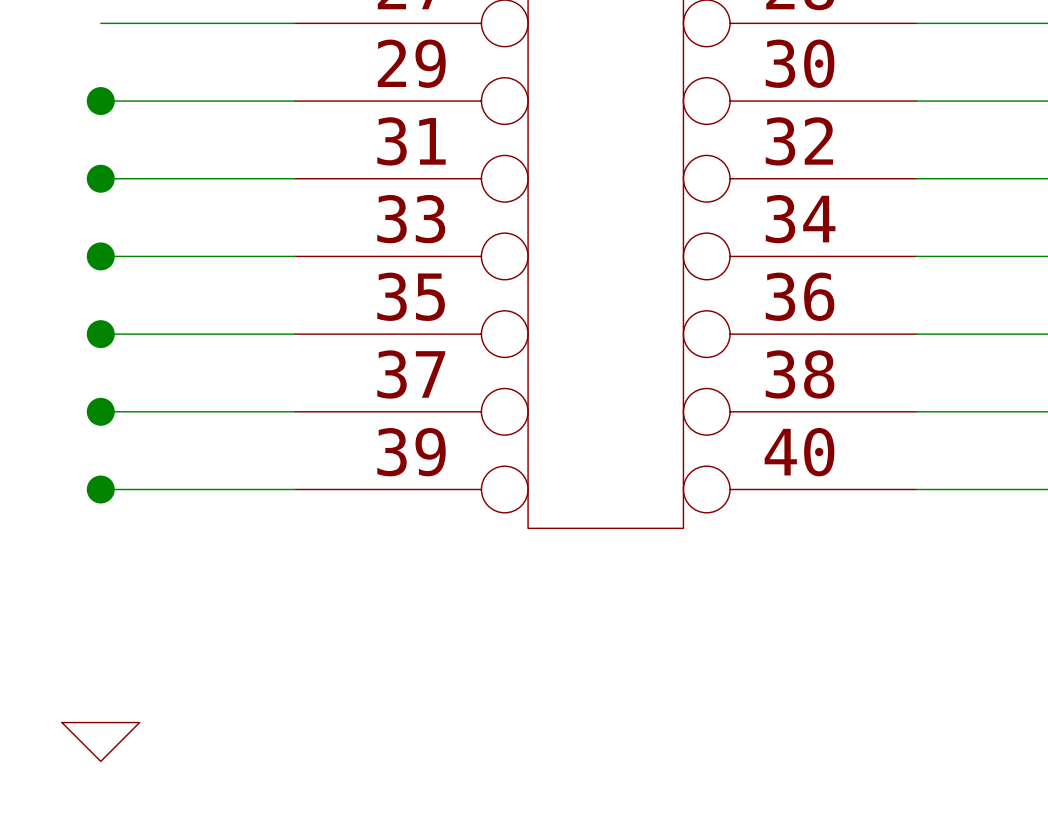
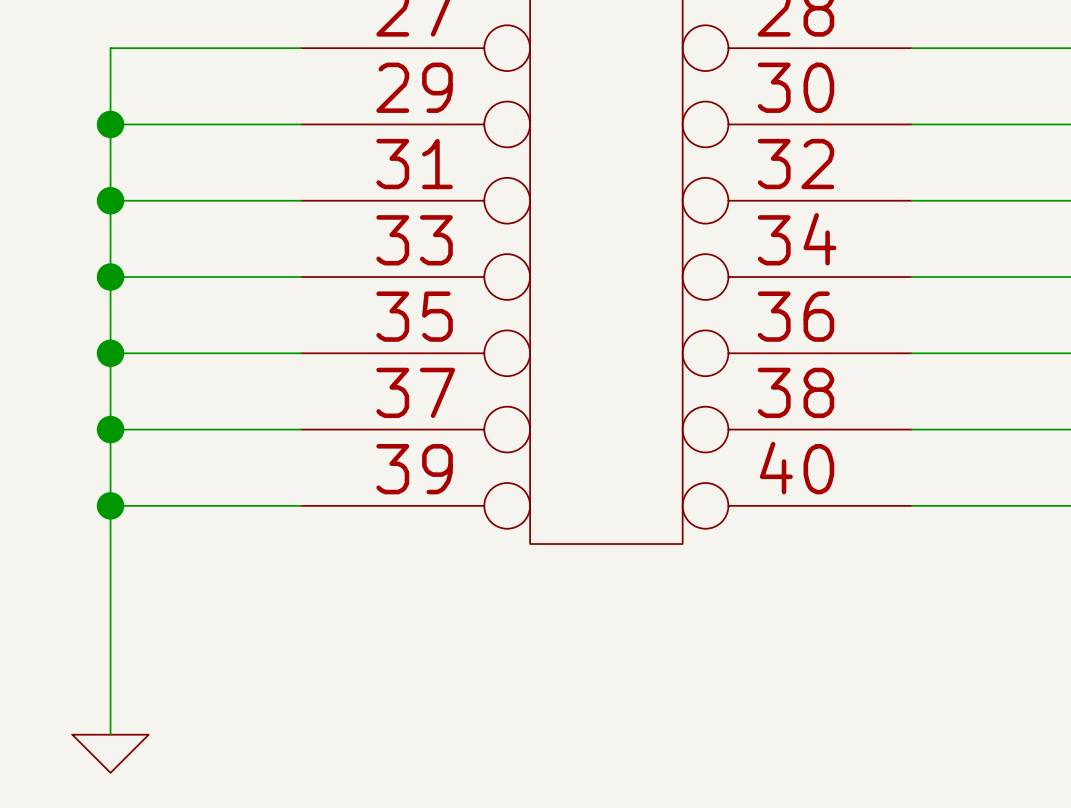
wire: none -> (110, 48) (110, 734)

